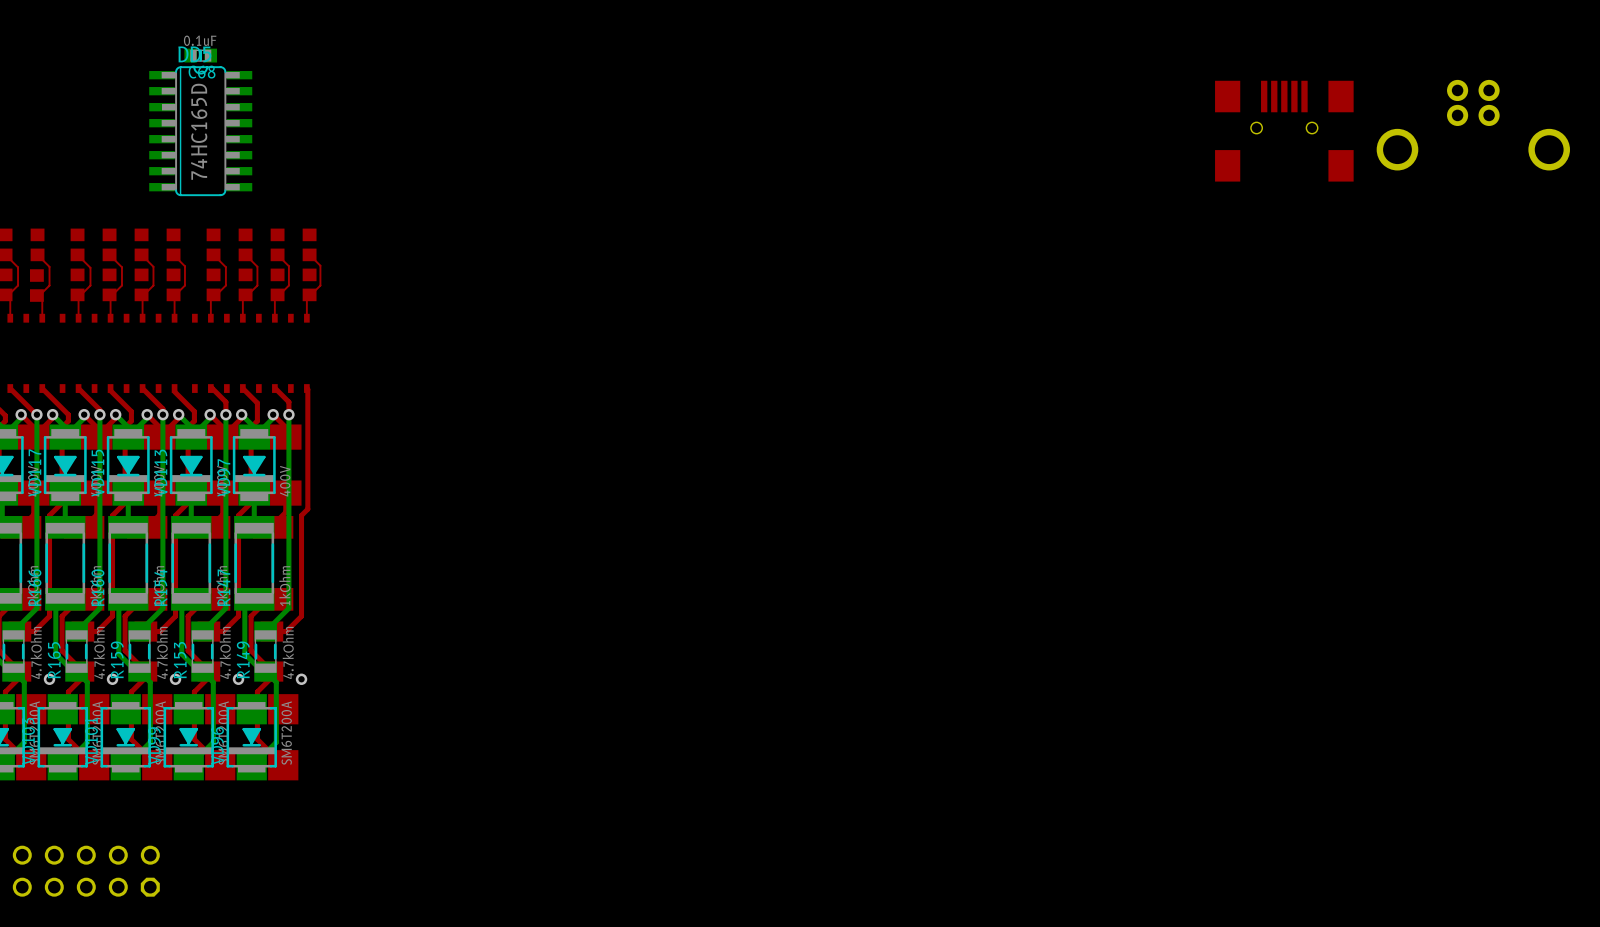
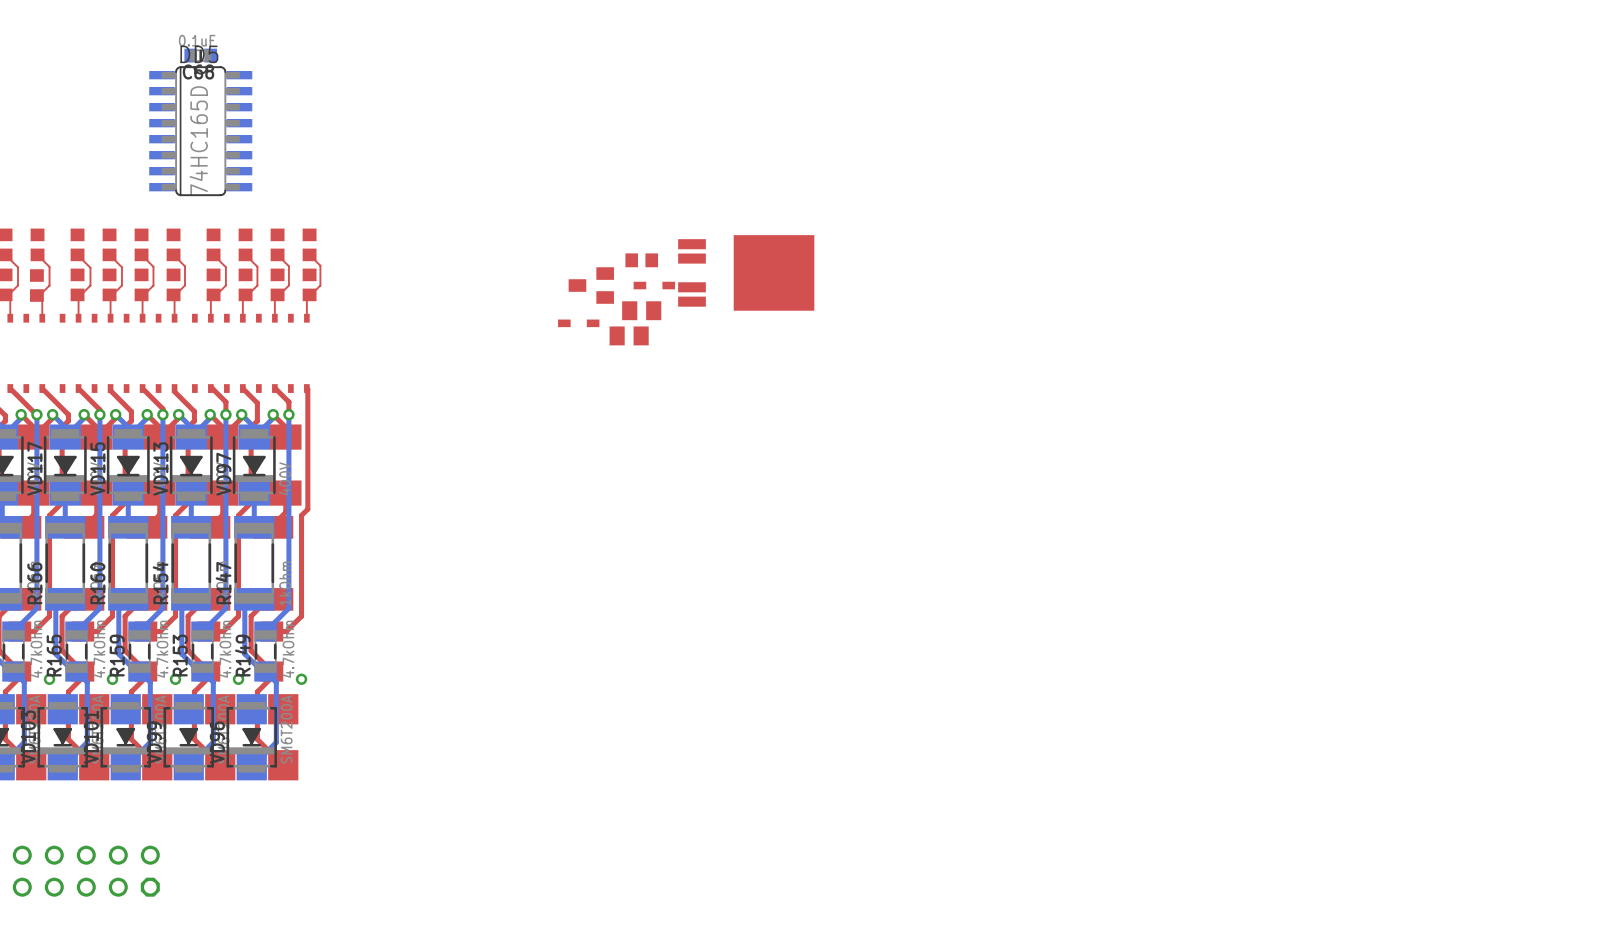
part: (1473, 125) -> none
part: (1284, 131) -> none
part: none -> (641, 260)
part: none -> (746, 272)
part: none -> (591, 285)
part: none -> (654, 285)
part: none -> (641, 310)
part: none -> (578, 323)
part: none -> (629, 335)

